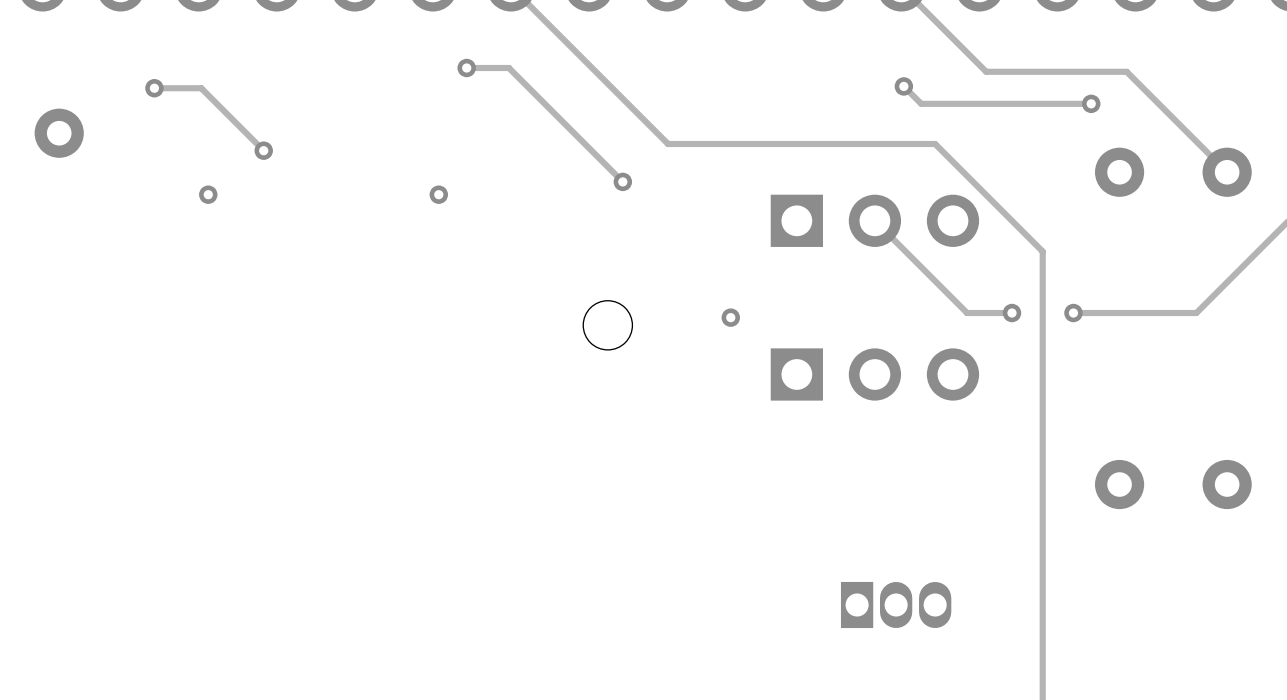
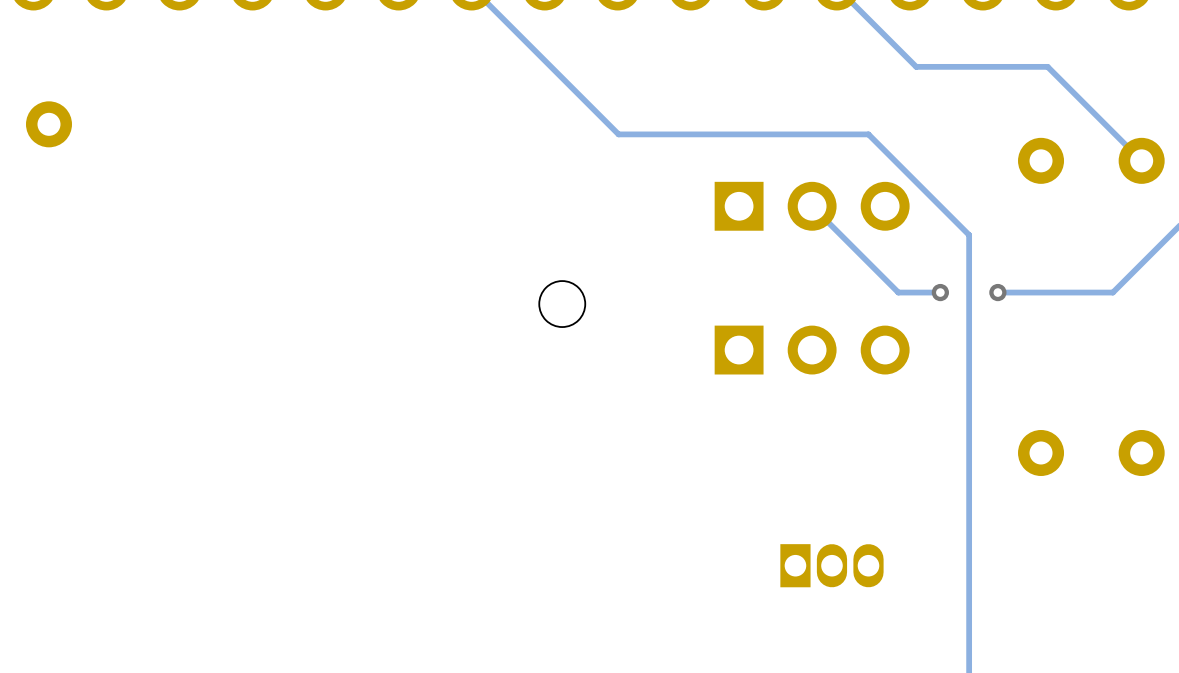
track: (466, 67) (508, 67) (622, 181) -> none
via: (466, 67) -> none
track: (903, 86) (921, 103) (1091, 103) -> none
via: (903, 86) -> none
track: (154, 88) (201, 88) (263, 150) -> none
via: (154, 88) -> none
via: (1091, 103) -> none
via: (263, 150) -> none
via: (622, 181) -> none
via: (208, 194) -> none
via: (438, 194) -> none
via: (730, 317) -> none

